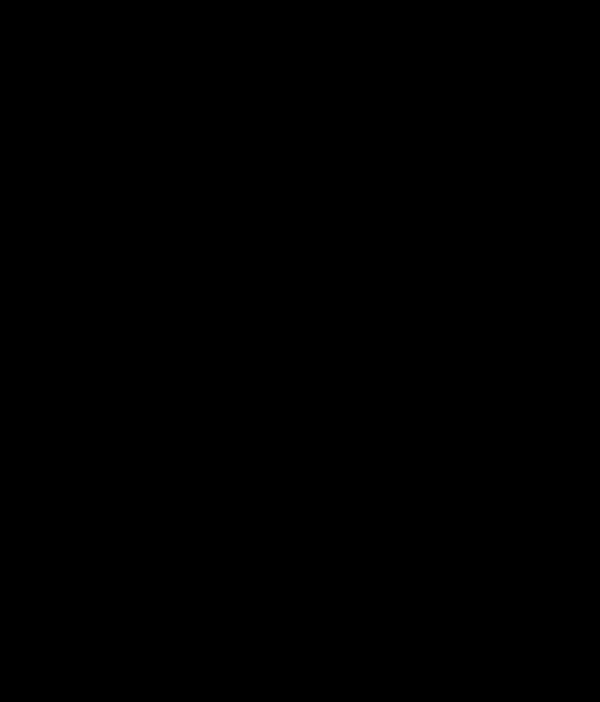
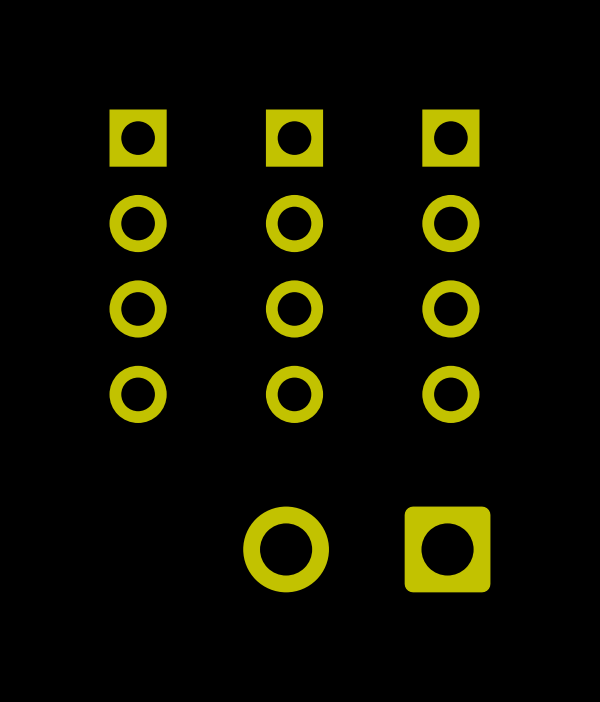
part: none -> (138, 266)
part: none -> (294, 266)
part: none -> (450, 266)
part: none -> (366, 549)

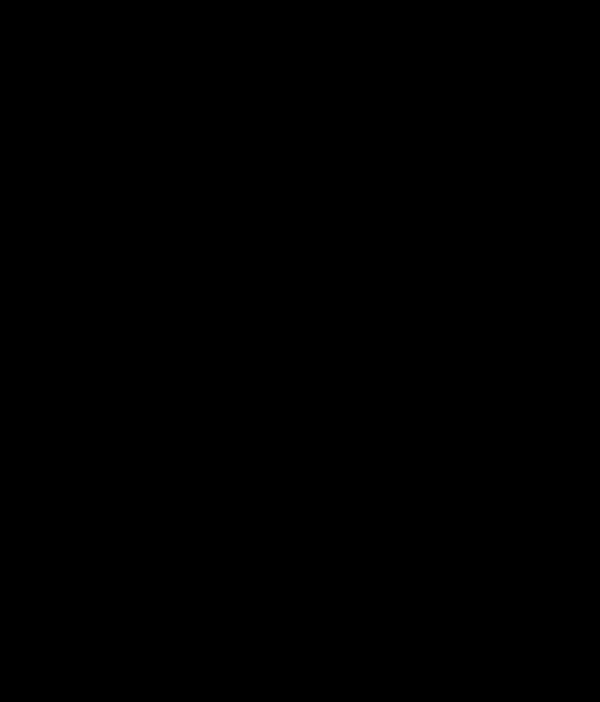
part: (138, 266) -> none
part: (294, 266) -> none
part: (450, 266) -> none
part: (366, 549) -> none

